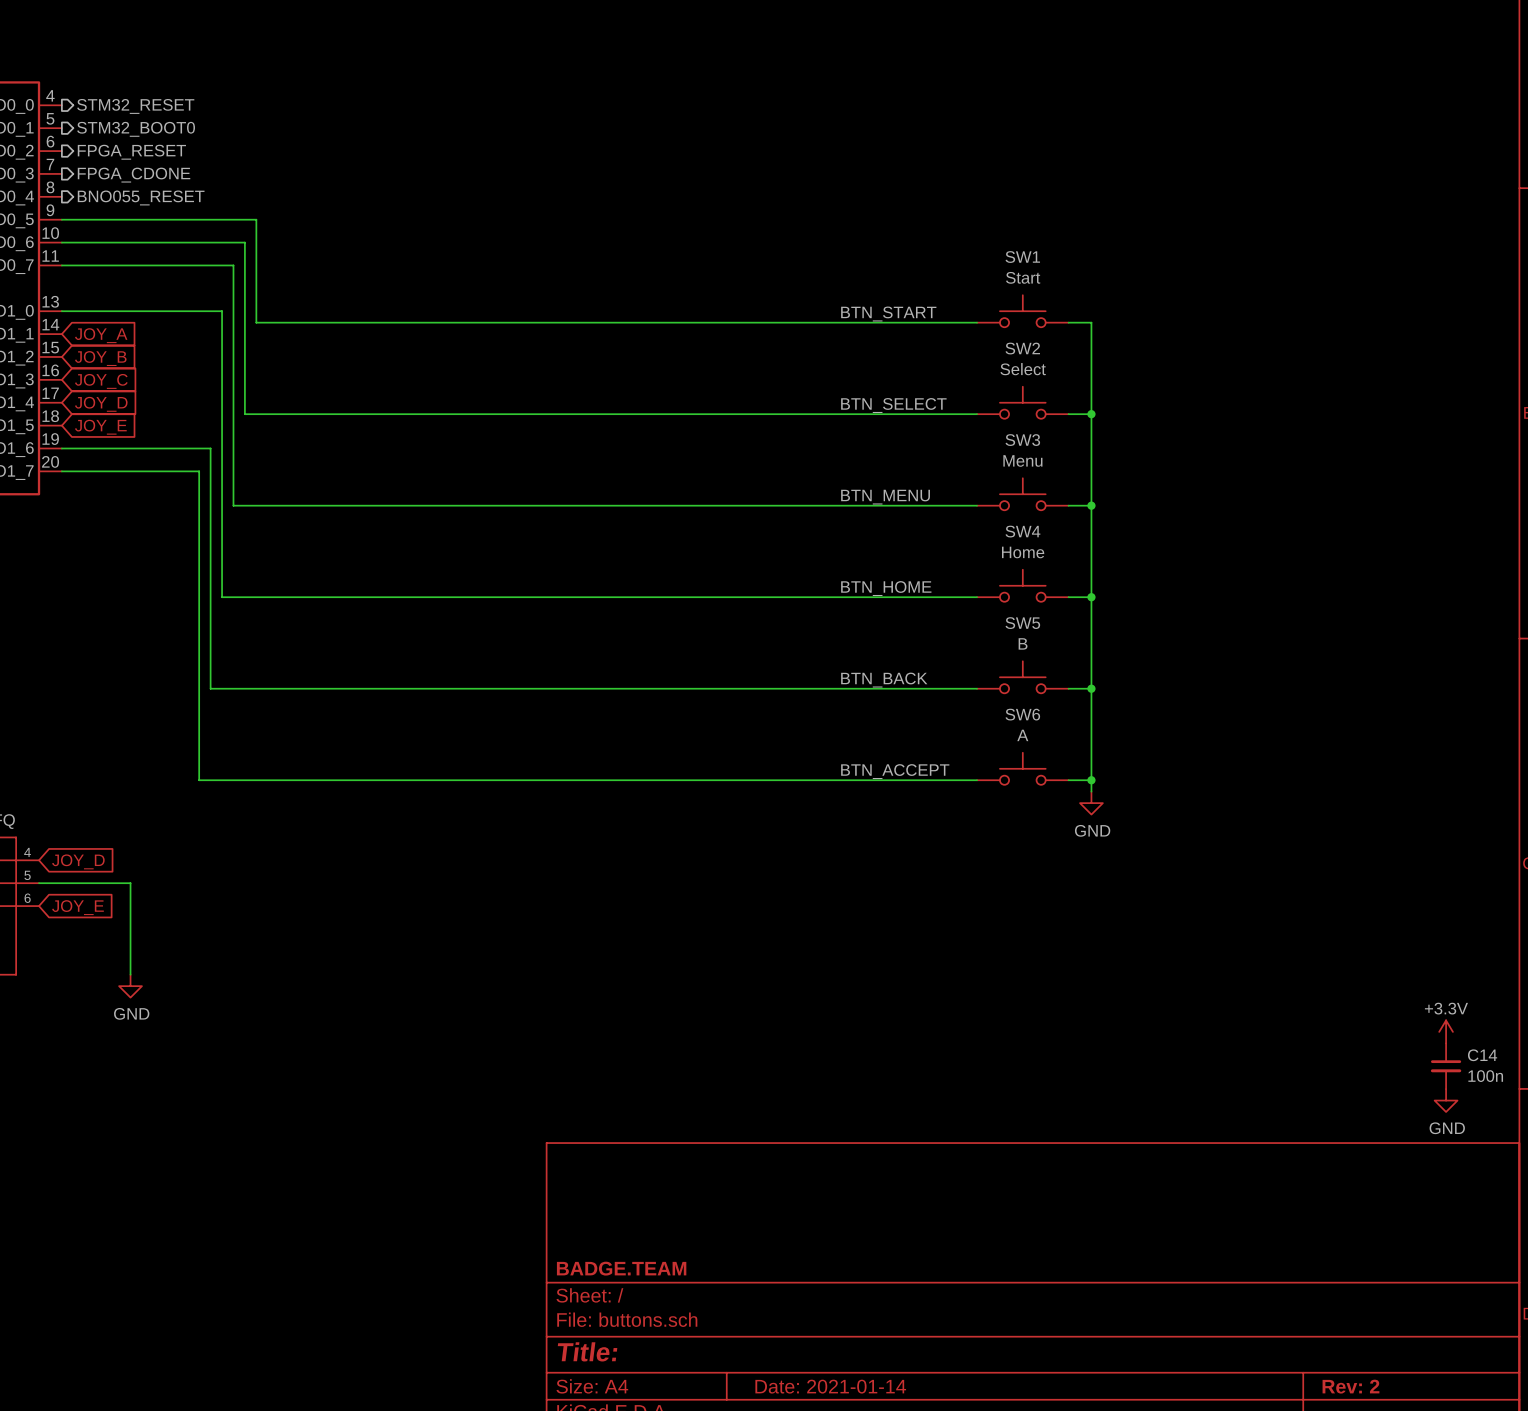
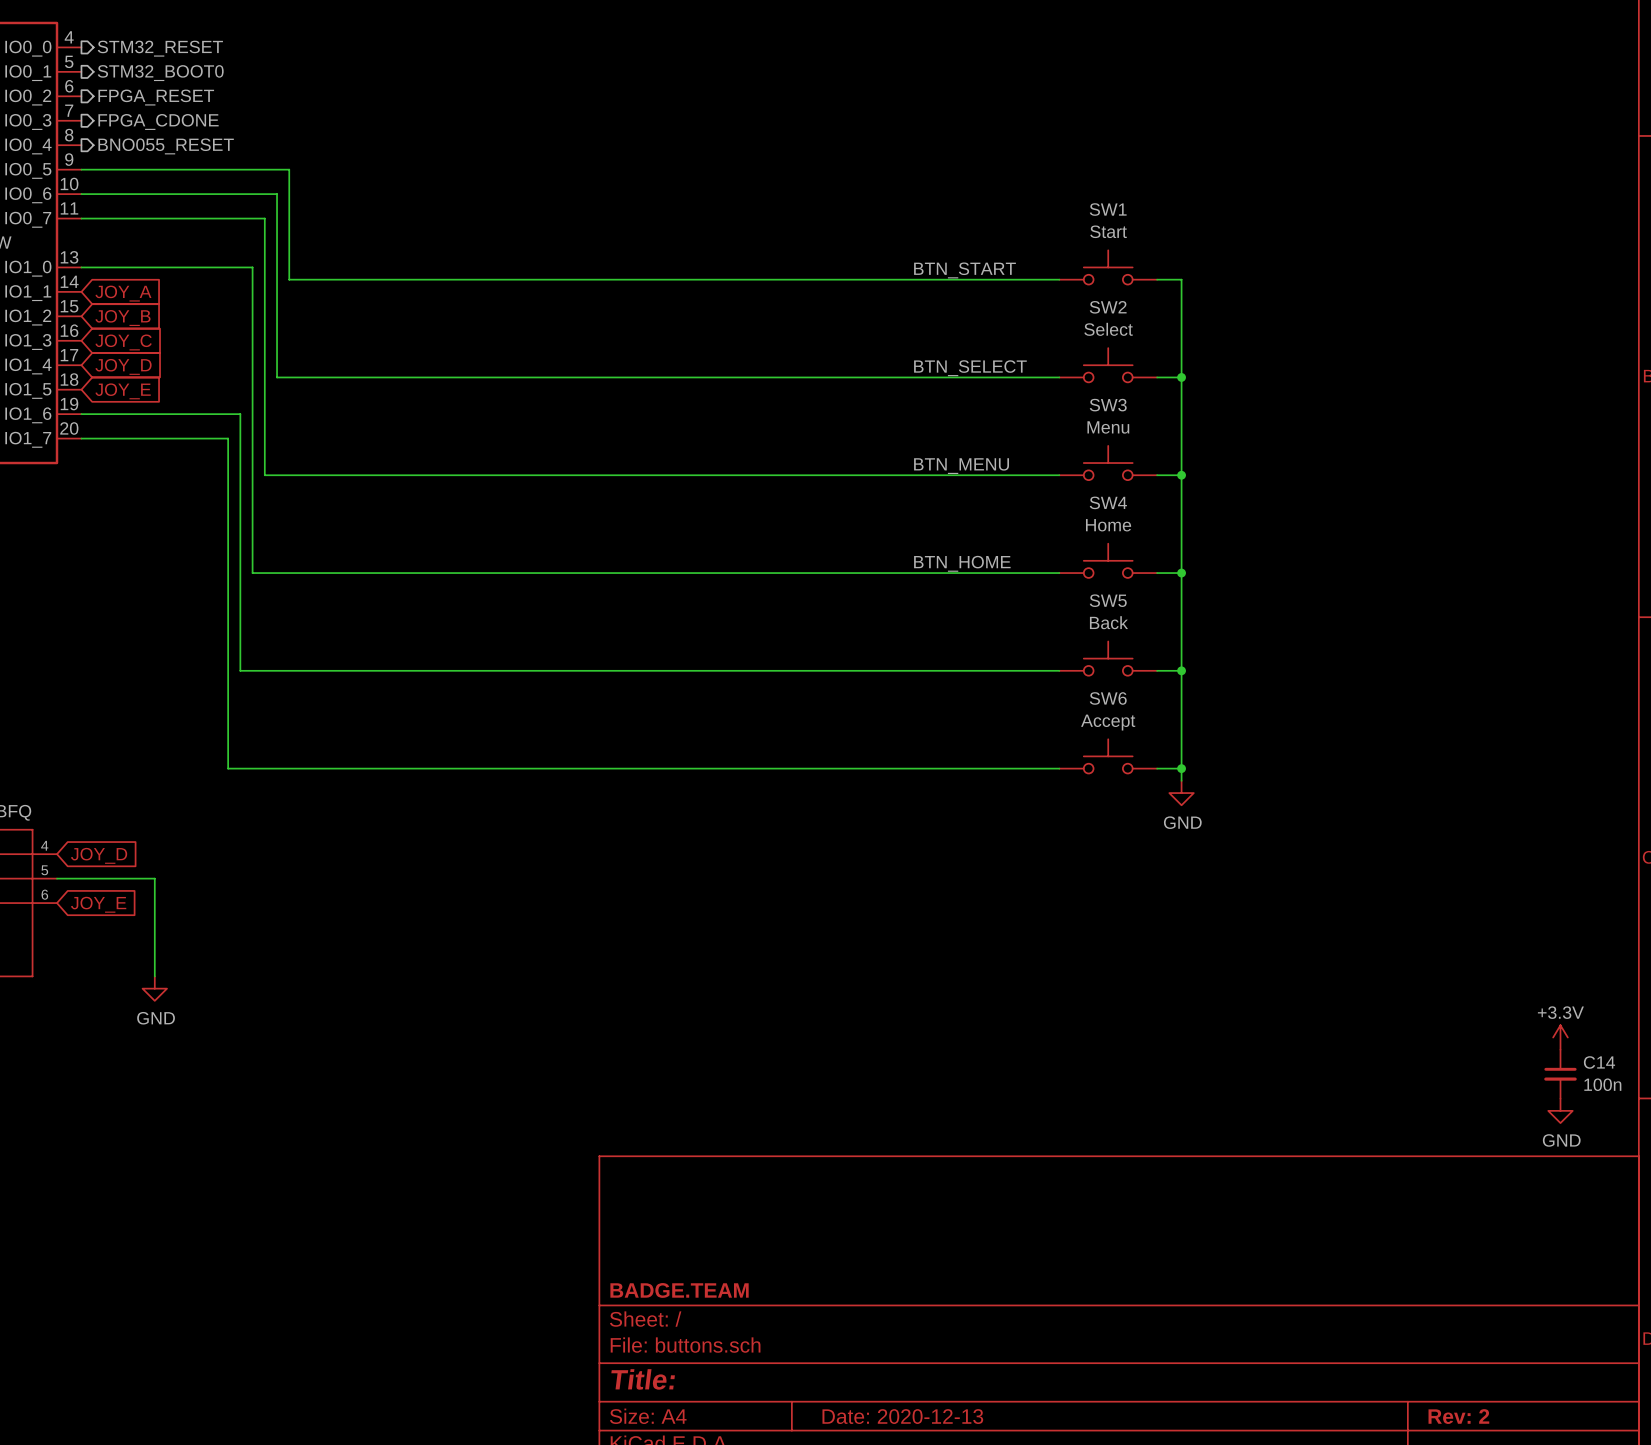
SW5 value: B (1023, 643) -> Back (1108, 622)
label: BTN_BACK (884, 680) -> none
SW6 value: A (1022, 735) -> Accept (1108, 722)
label: BTN_ACCEPT (895, 771) -> none
title block: Date: 2021-01-14 (830, 1386) -> Date: 2020-12-13 (902, 1416)

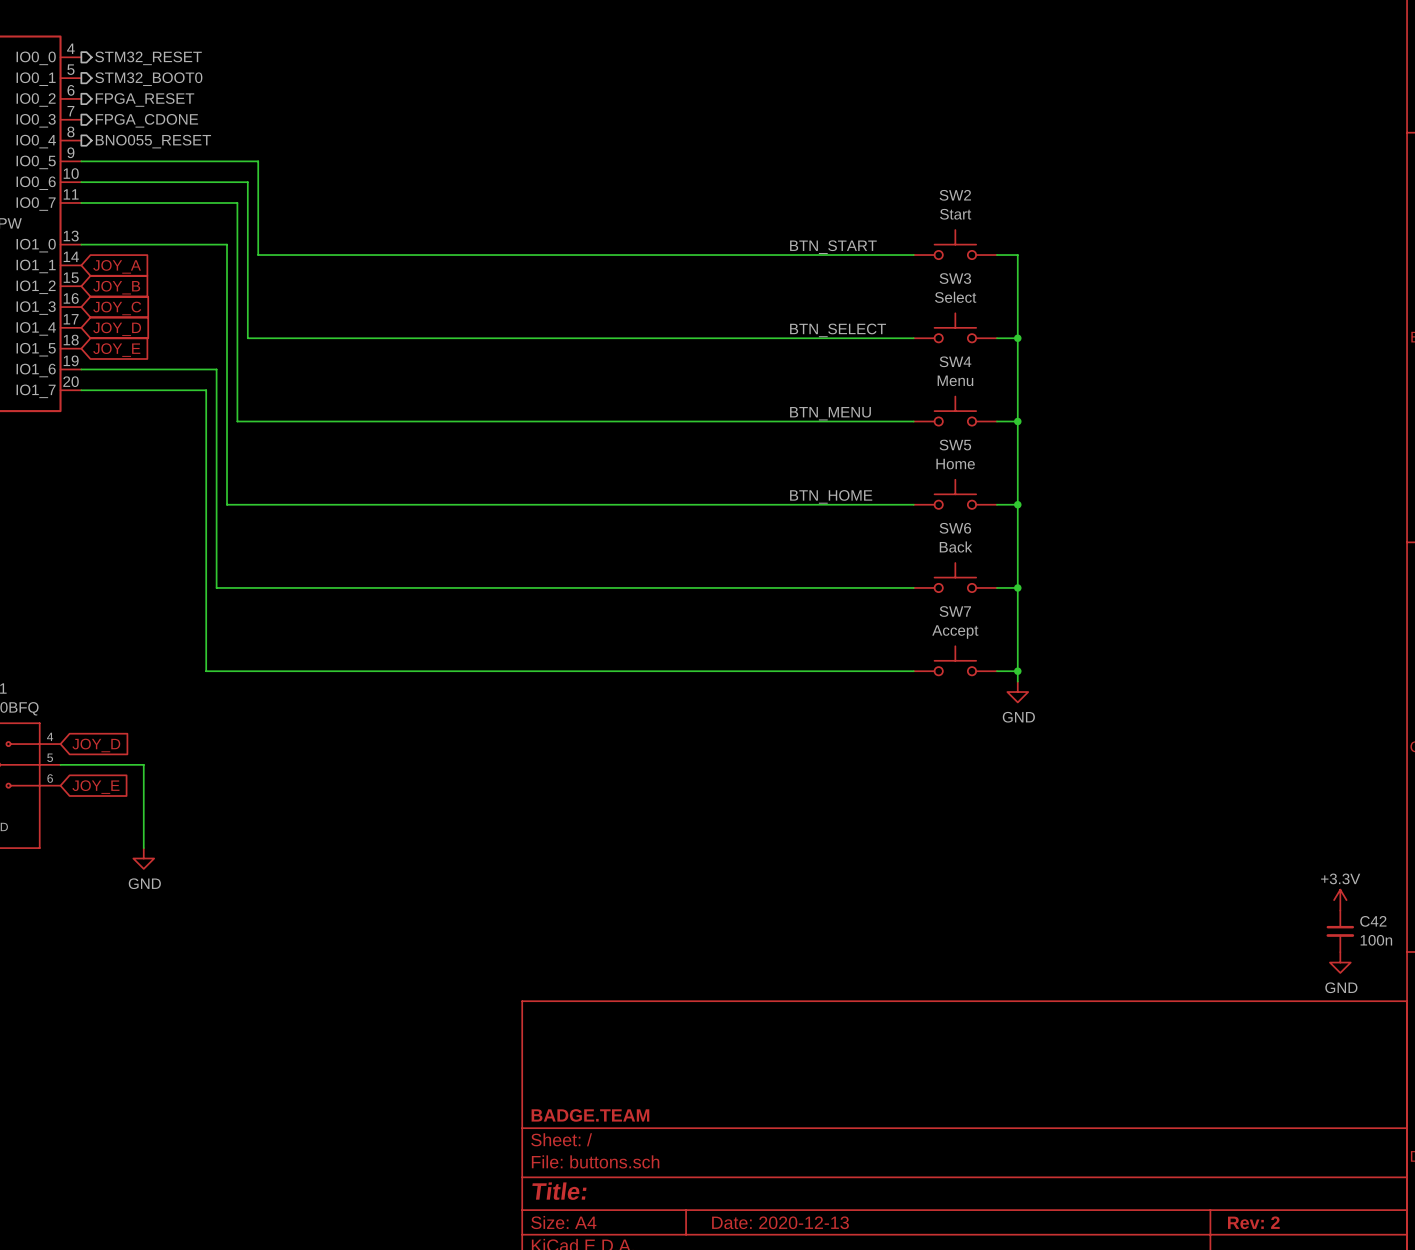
SW1 name: SW1 (1108, 209) -> SW2 (955, 195)
SW2 name: SW2 (1108, 307) -> SW3 (955, 278)
SW3 name: SW3 (1108, 405) -> SW4 (955, 361)
SW4 name: SW4 (1108, 502) -> SW5 (955, 445)
SW5 name: SW5 (1108, 600) -> SW6 (955, 528)
SW6 name: SW6 (1108, 698) -> SW7 (955, 611)
C14 name: C14 (1599, 1062) -> C42 (1373, 921)

